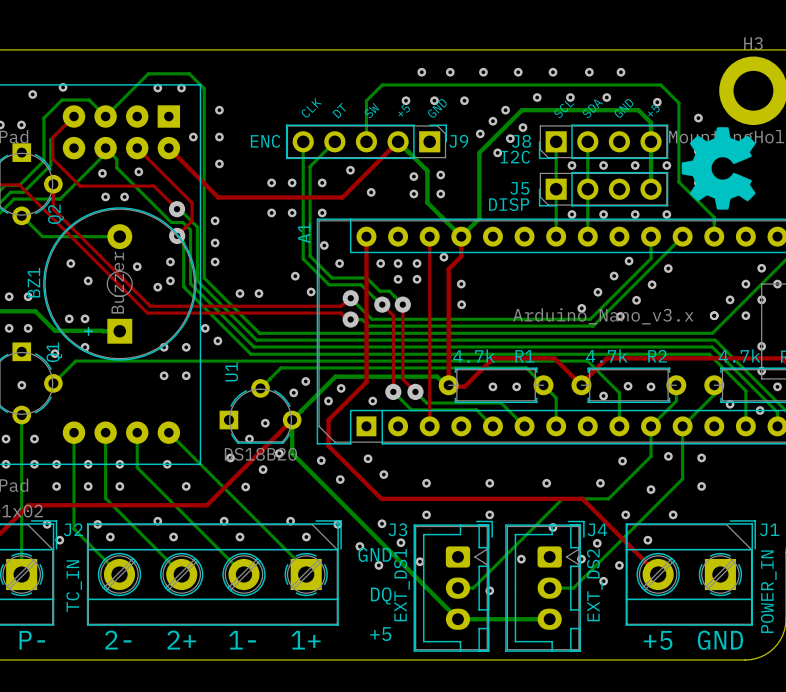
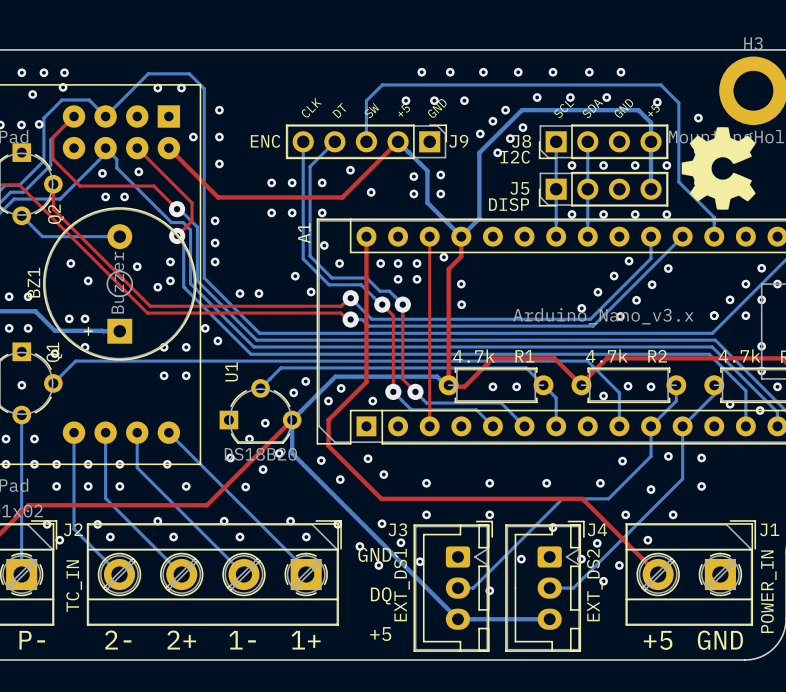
via: none -> (21, 72)
via: none -> (43, 72)
via: none -> (64, 72)
via: none -> (39, 124)

